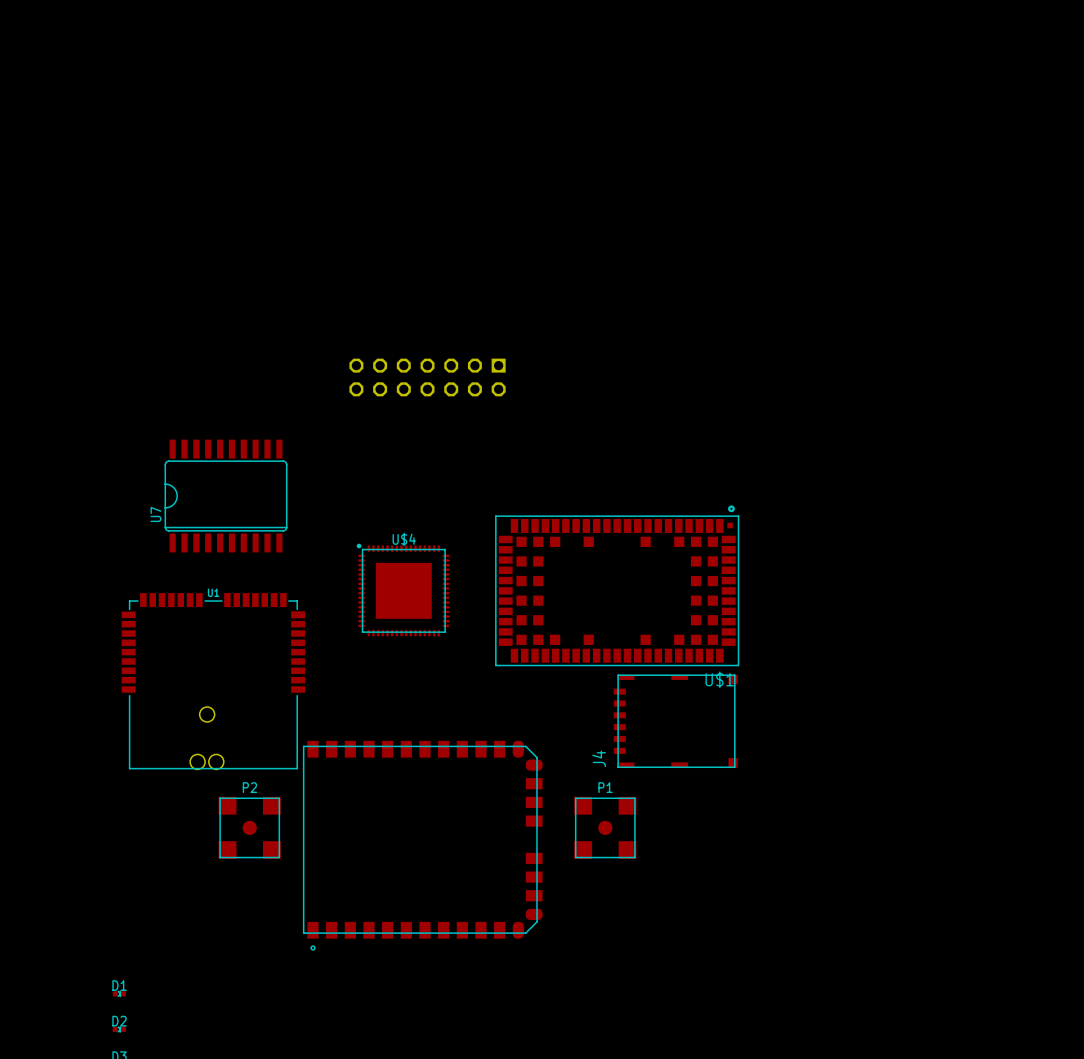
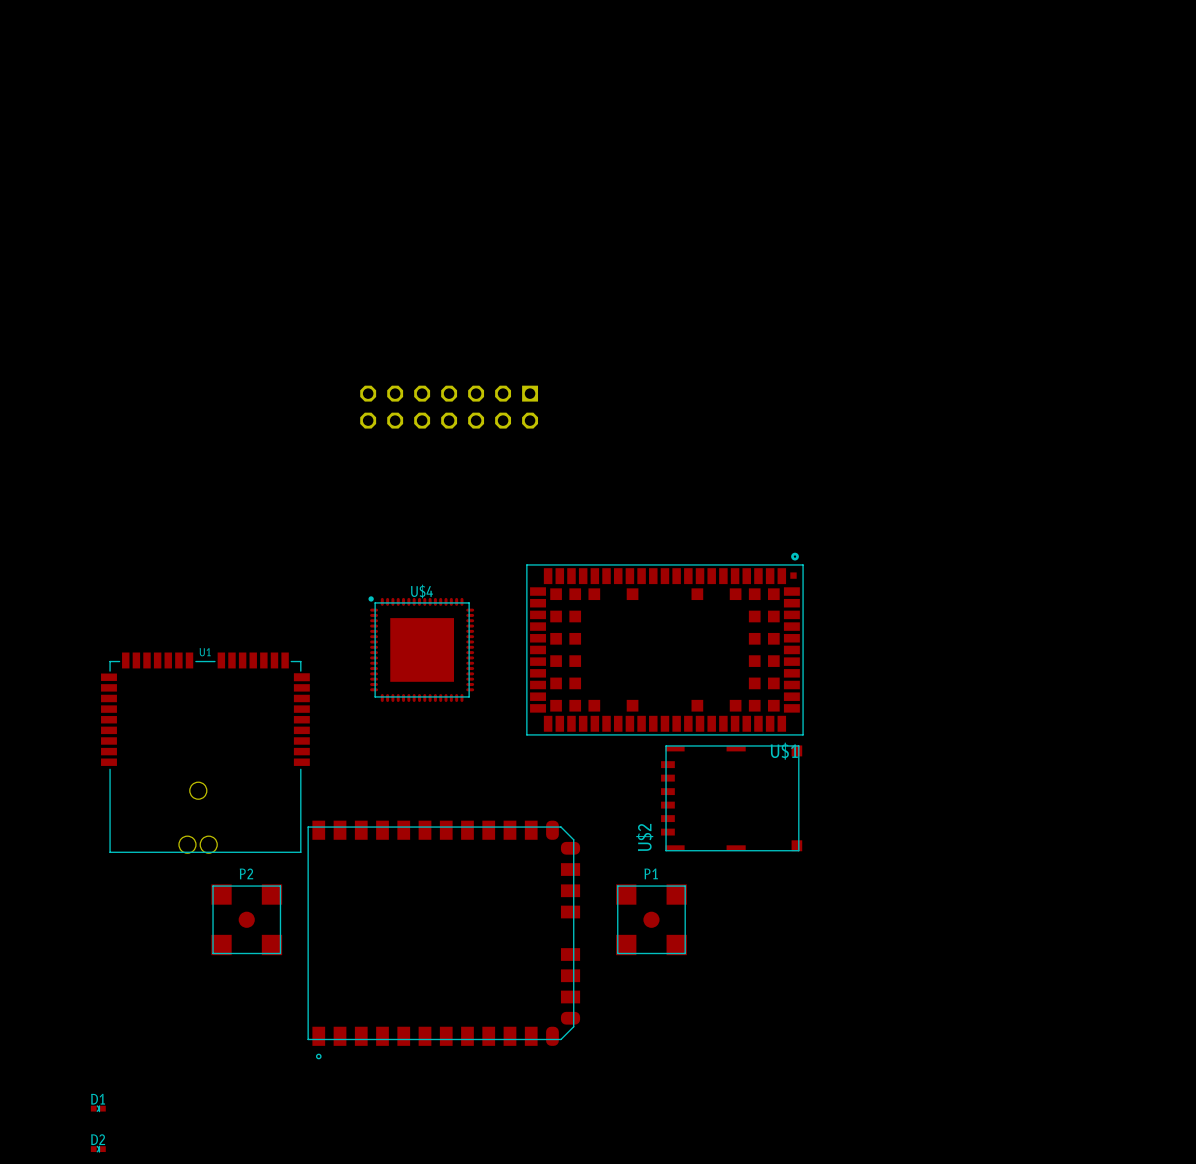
U7: (226, 496) -> none
J4 name: J4 (599, 758) -> U$2 (644, 837)

